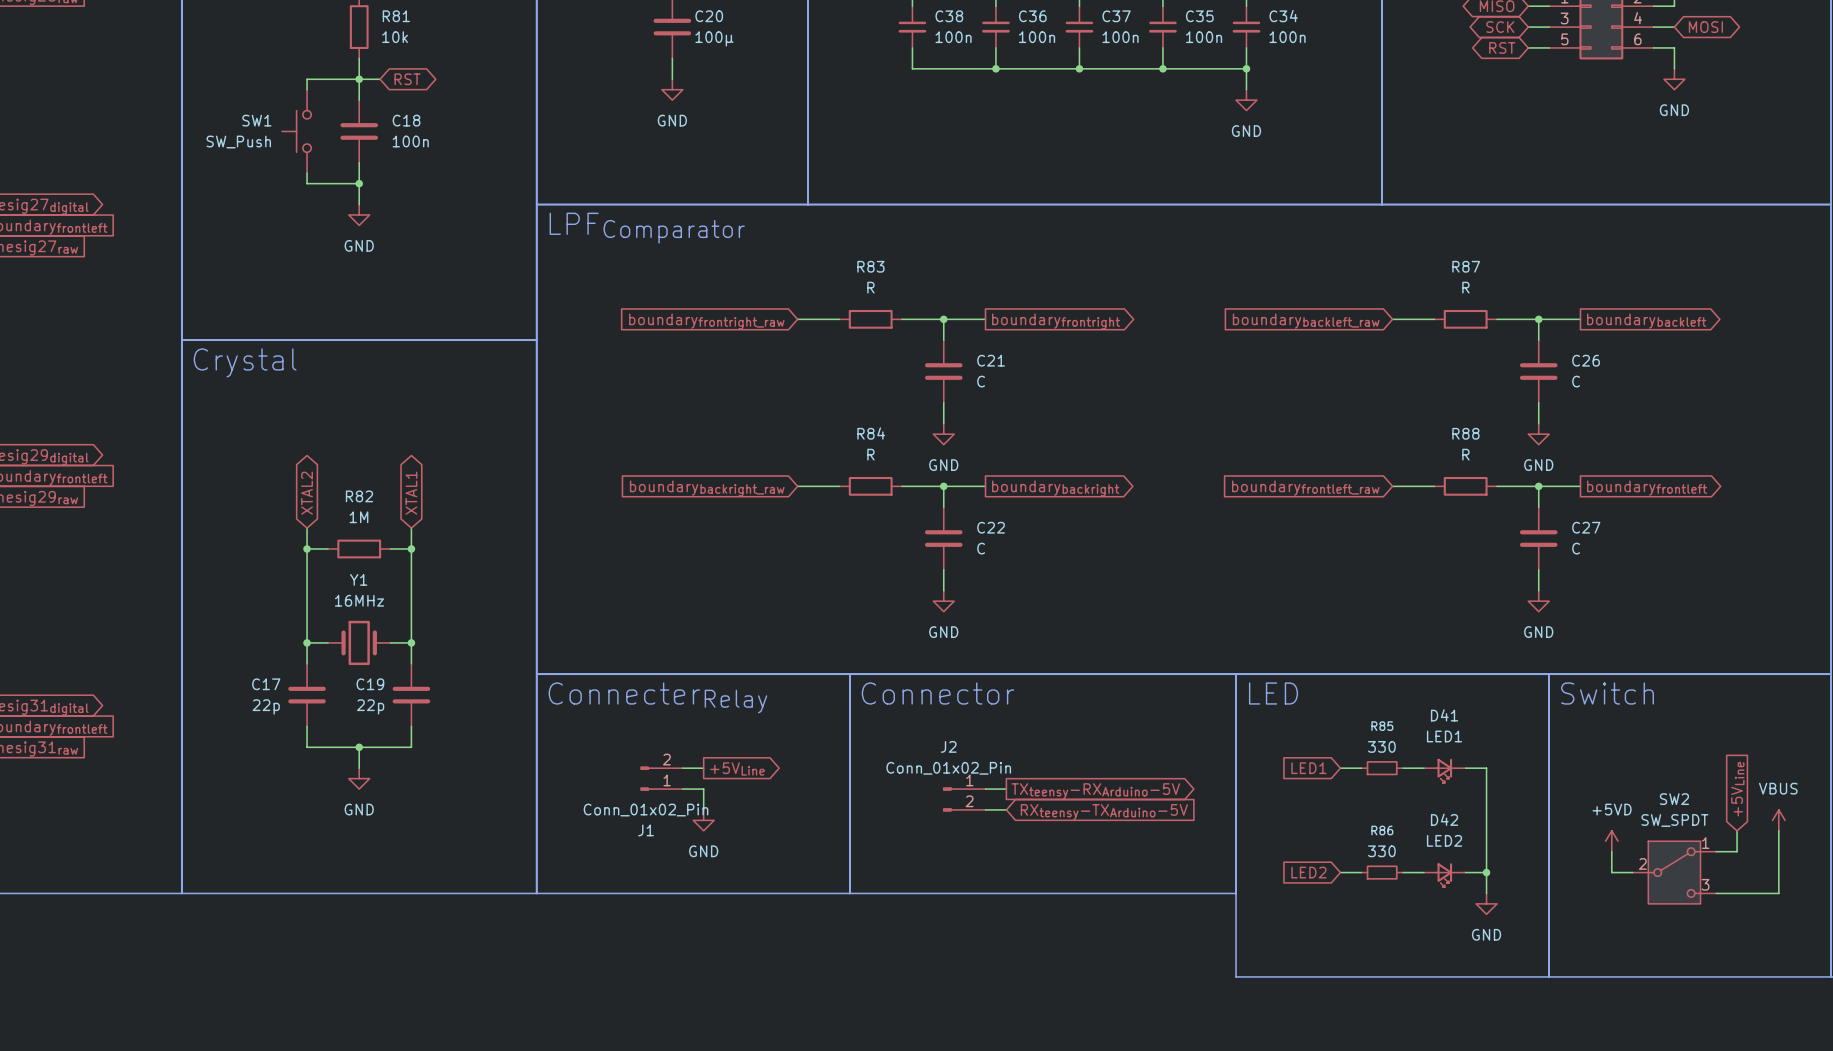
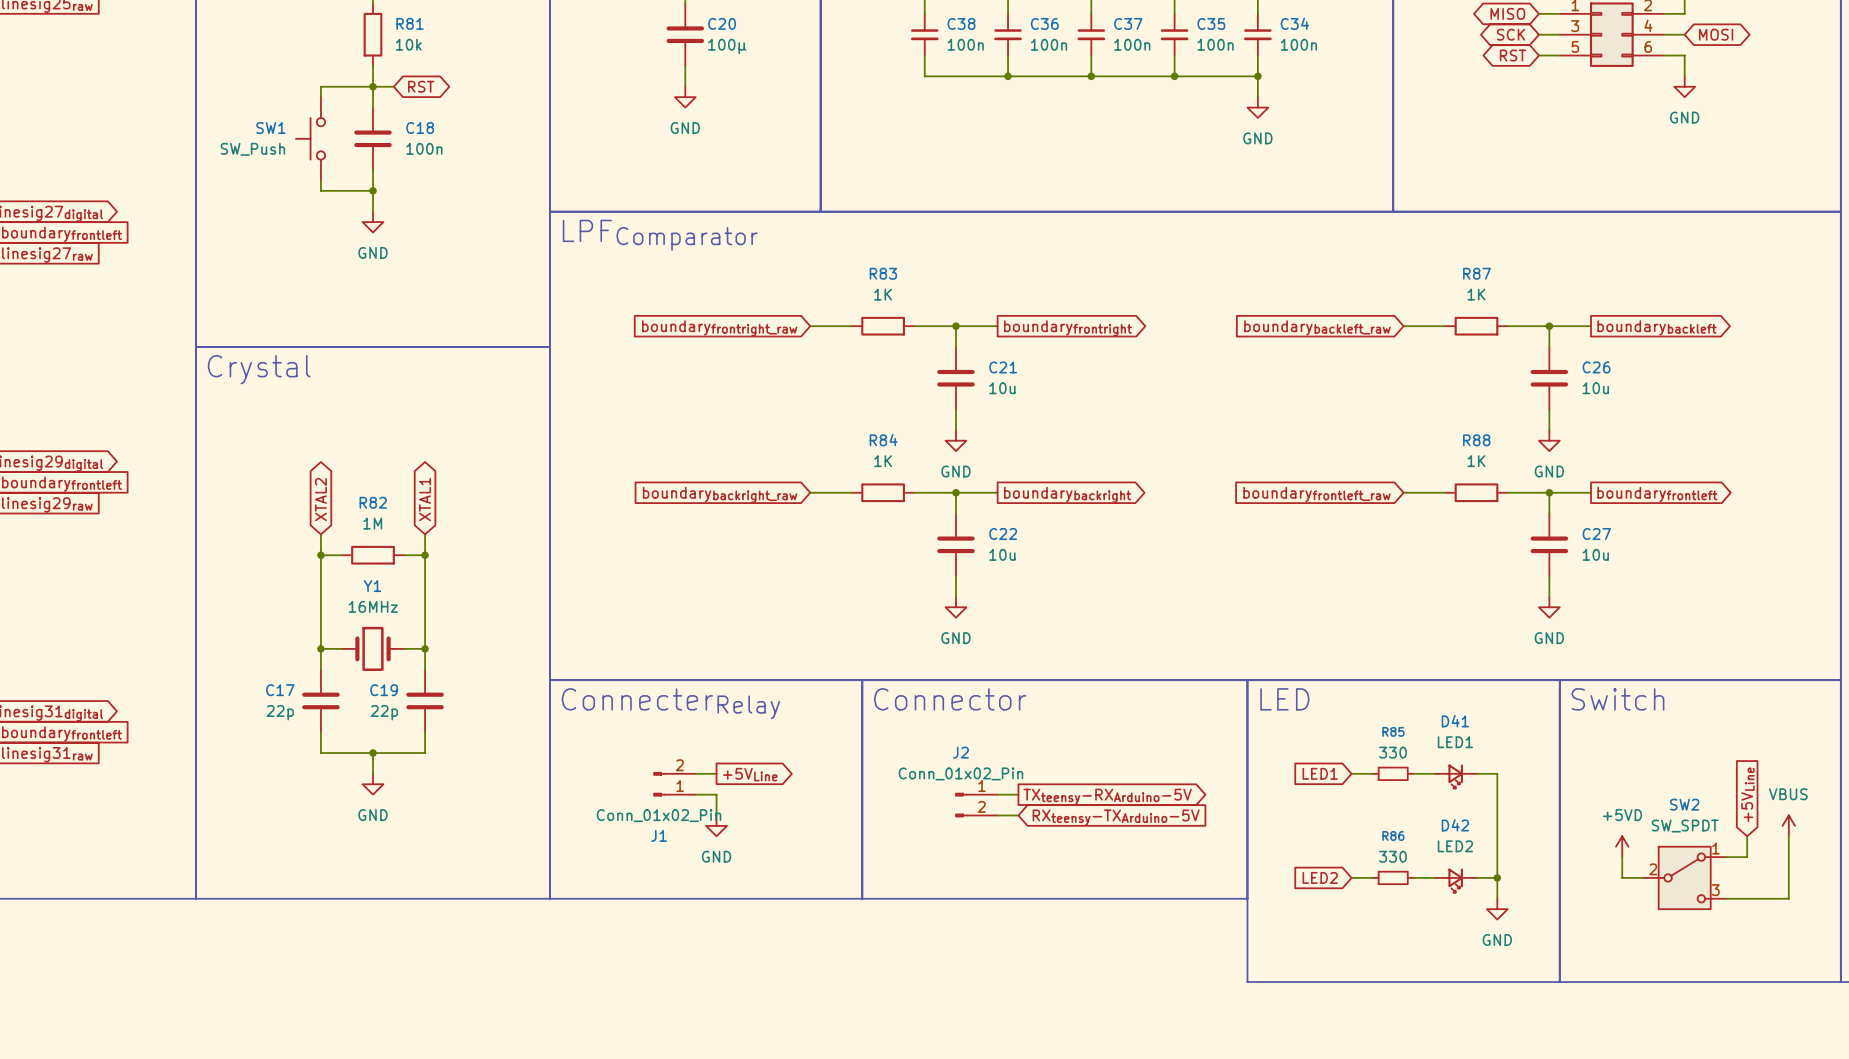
R83 value: R (870, 287) -> 1K (883, 294)
R87 value: R (1465, 287) -> 1K (1476, 294)
C21 value: C (981, 381) -> 10u (1002, 388)
C26 value: C (1576, 381) -> 10u (1595, 388)
R84 value: R (870, 454) -> 1K (883, 461)
R88 value: R (1465, 454) -> 1K (1476, 461)
C22 value: C (981, 548) -> 10u (1002, 554)
C27 value: C (1576, 548) -> 10u (1595, 554)

